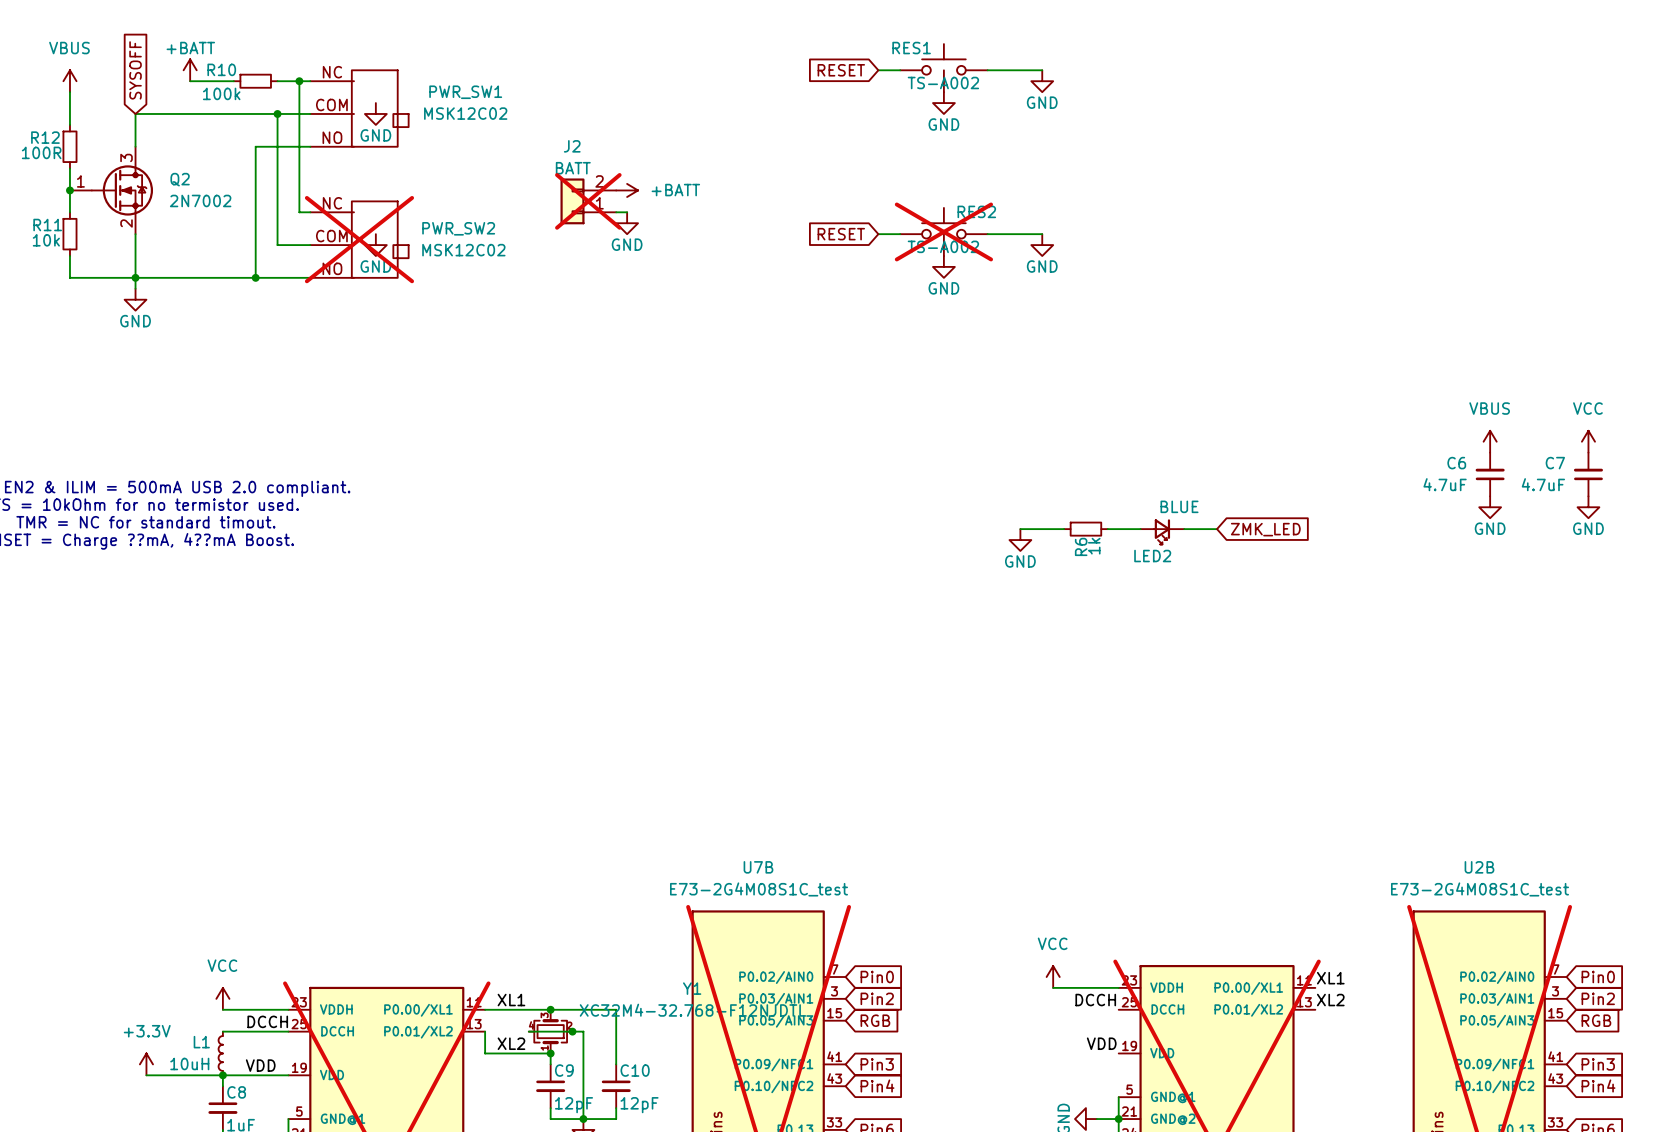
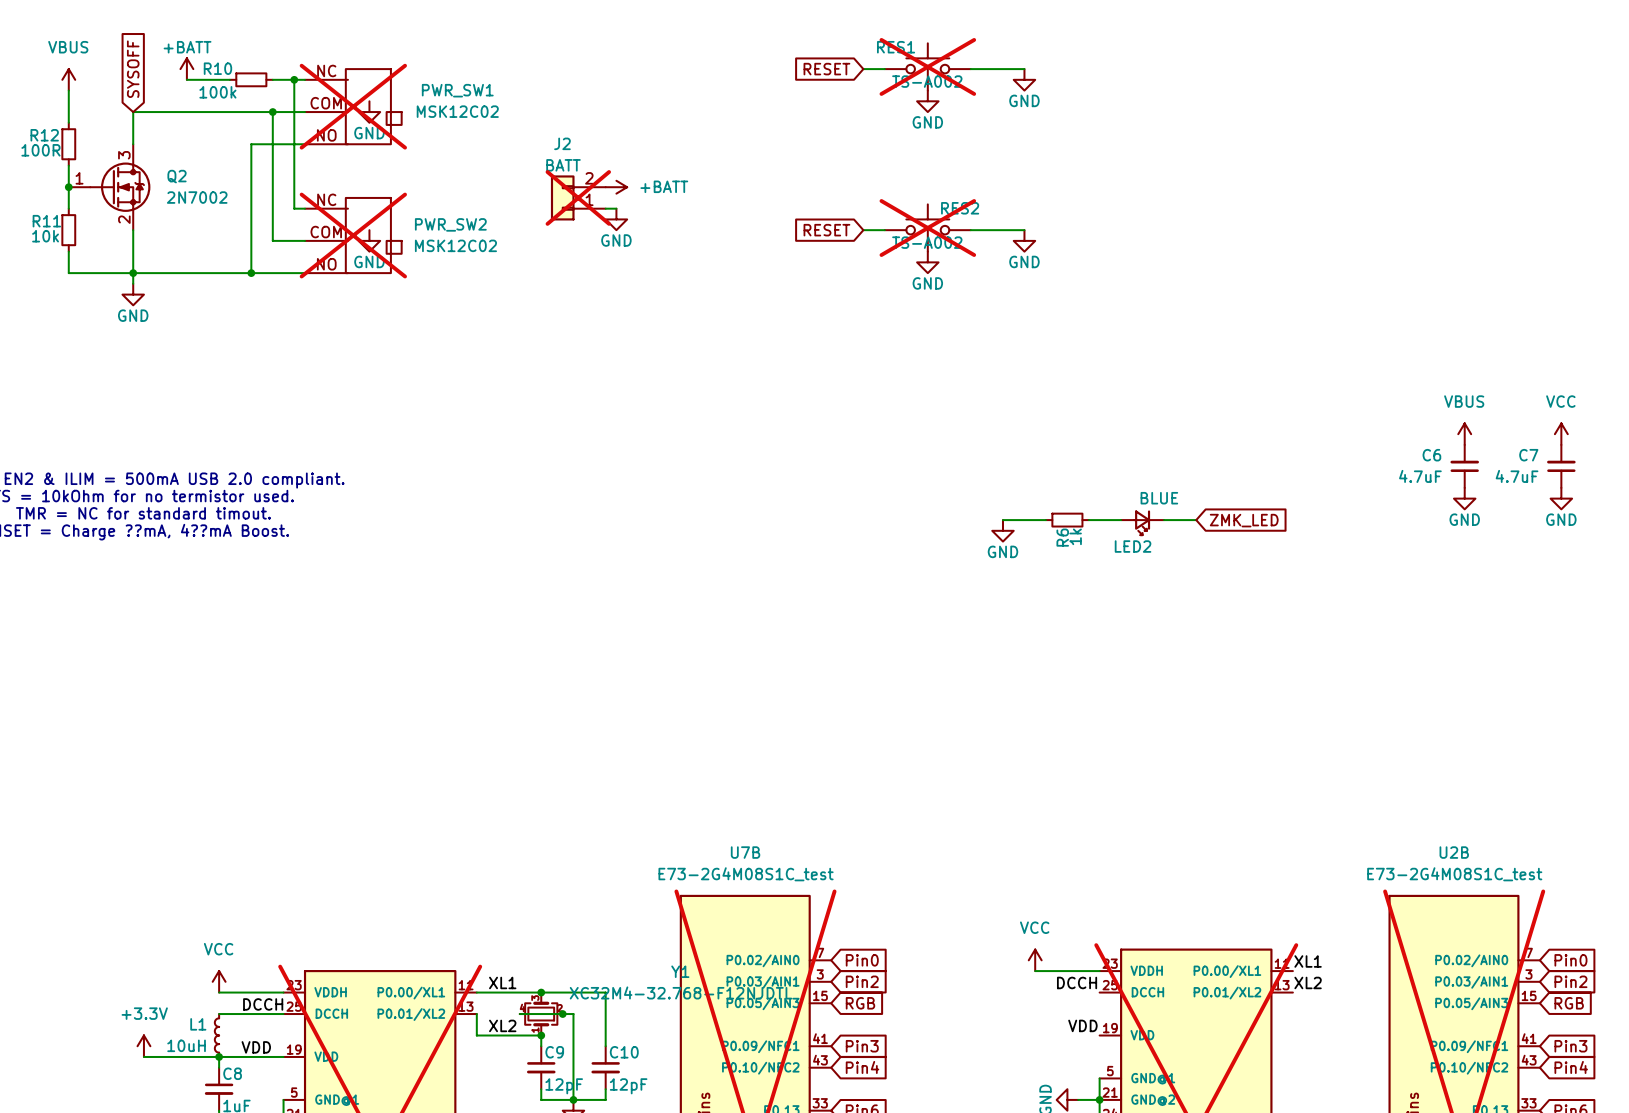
RES1 do-not-place cross: none -> (927, 66)
PWR_SW1 do-not-place cross: none -> (353, 106)

